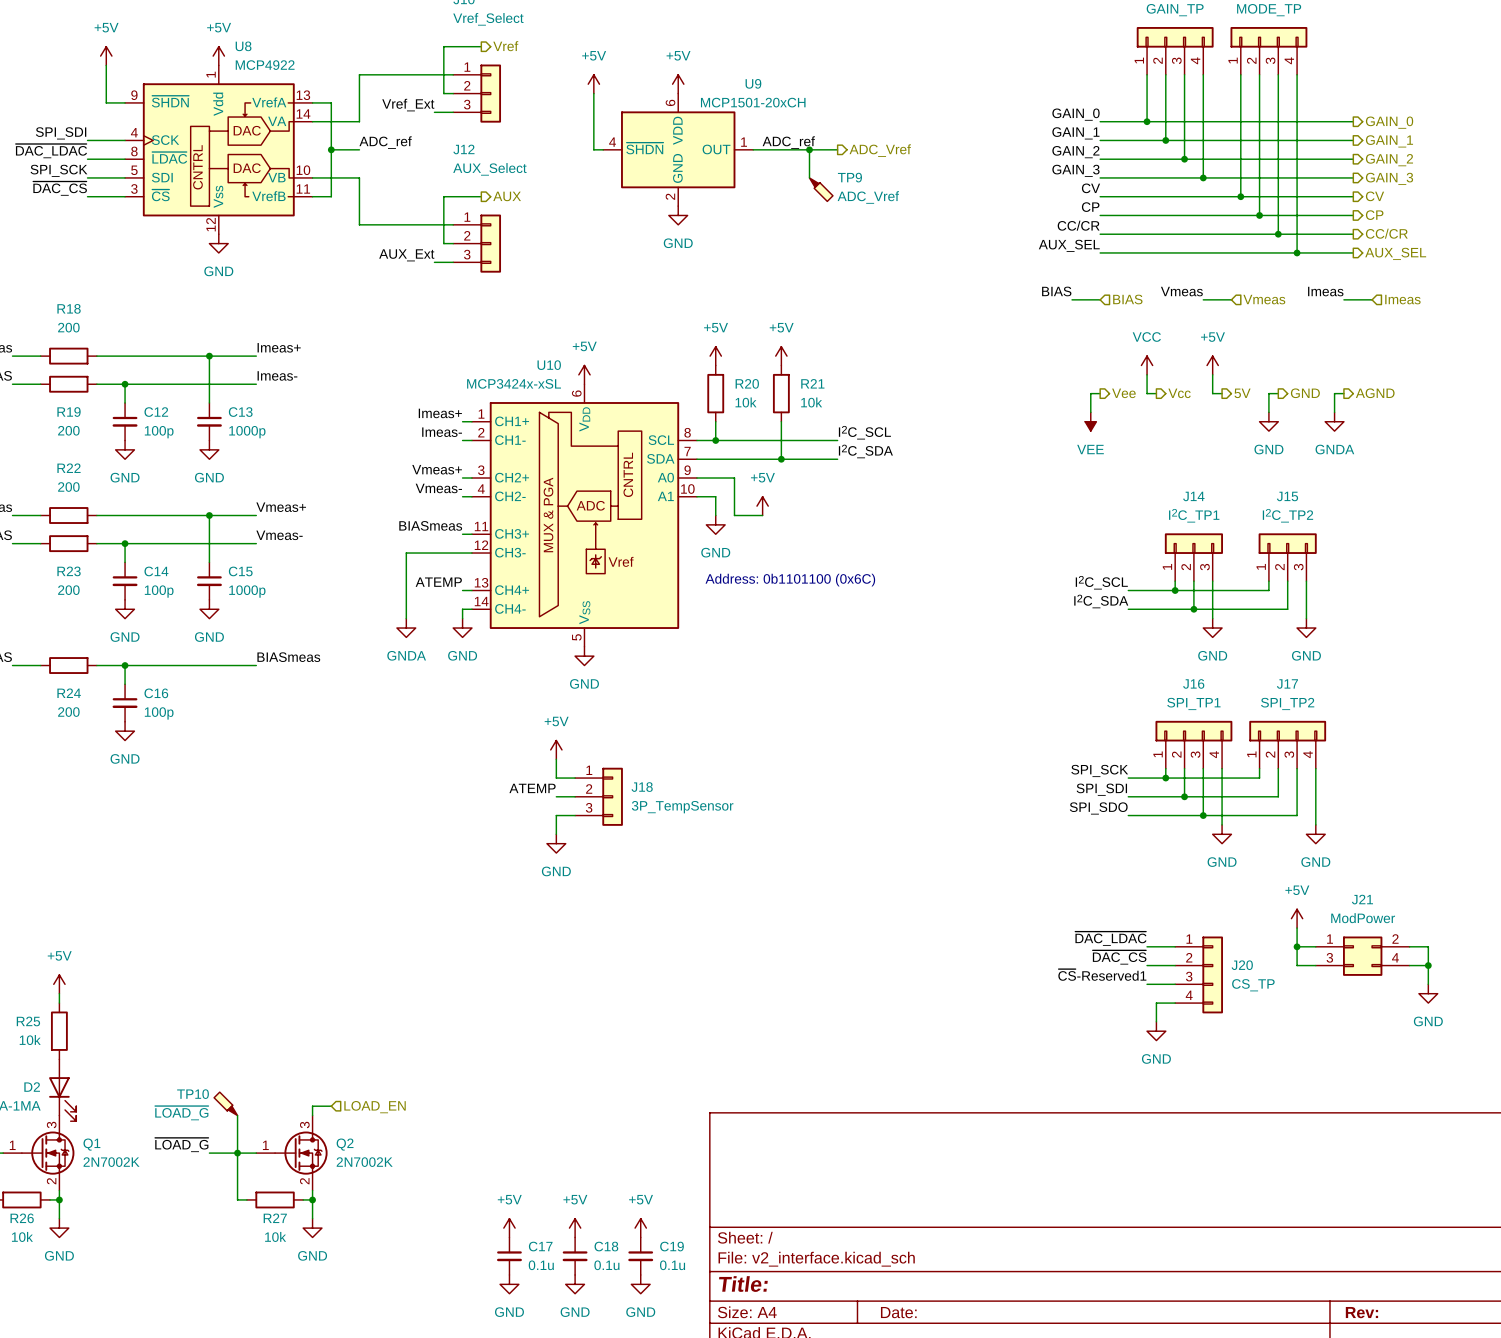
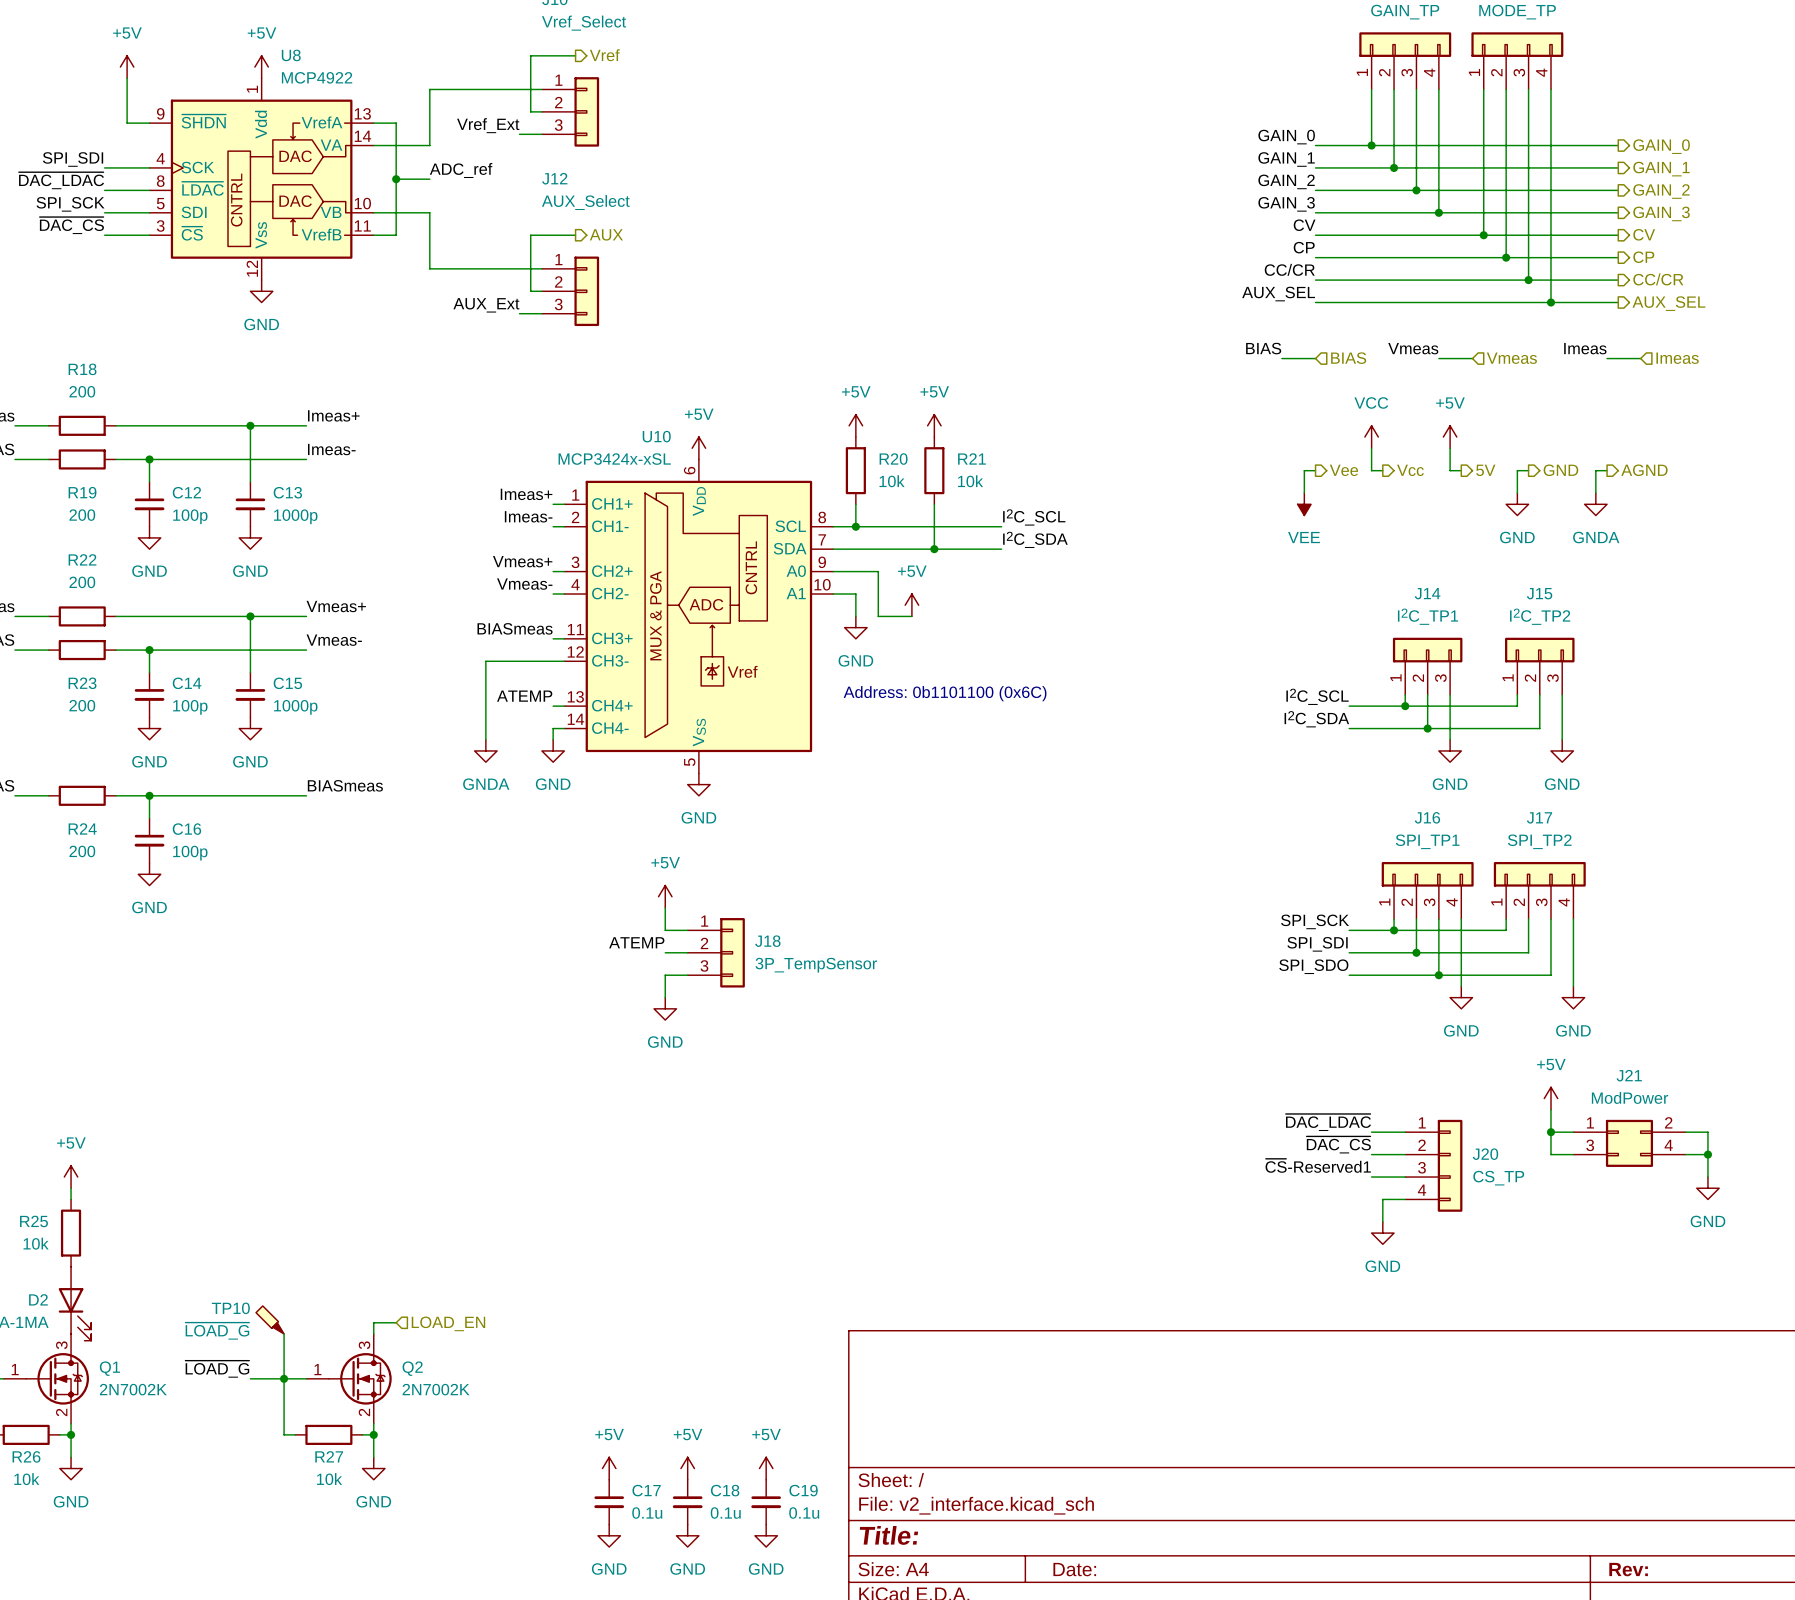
power symbol: +5V (593, 84) -> none
power symbol: +5V (678, 84) -> none
wire: (593, 93) (593, 149) (603, 149) -> none
label: ADC_ref (788, 142) -> none
U9: MCP1501-20xCH (678, 149) -> none
wire: (753, 149) (837, 149) -> none
wire: (809, 149) (809, 177) -> none
junction: (809, 149) -> none
hierarchical label: ADC_Vref (880, 150) -> none
TP9: ADC_Vref (821, 189) -> none
power symbol: GND (678, 215) -> none

